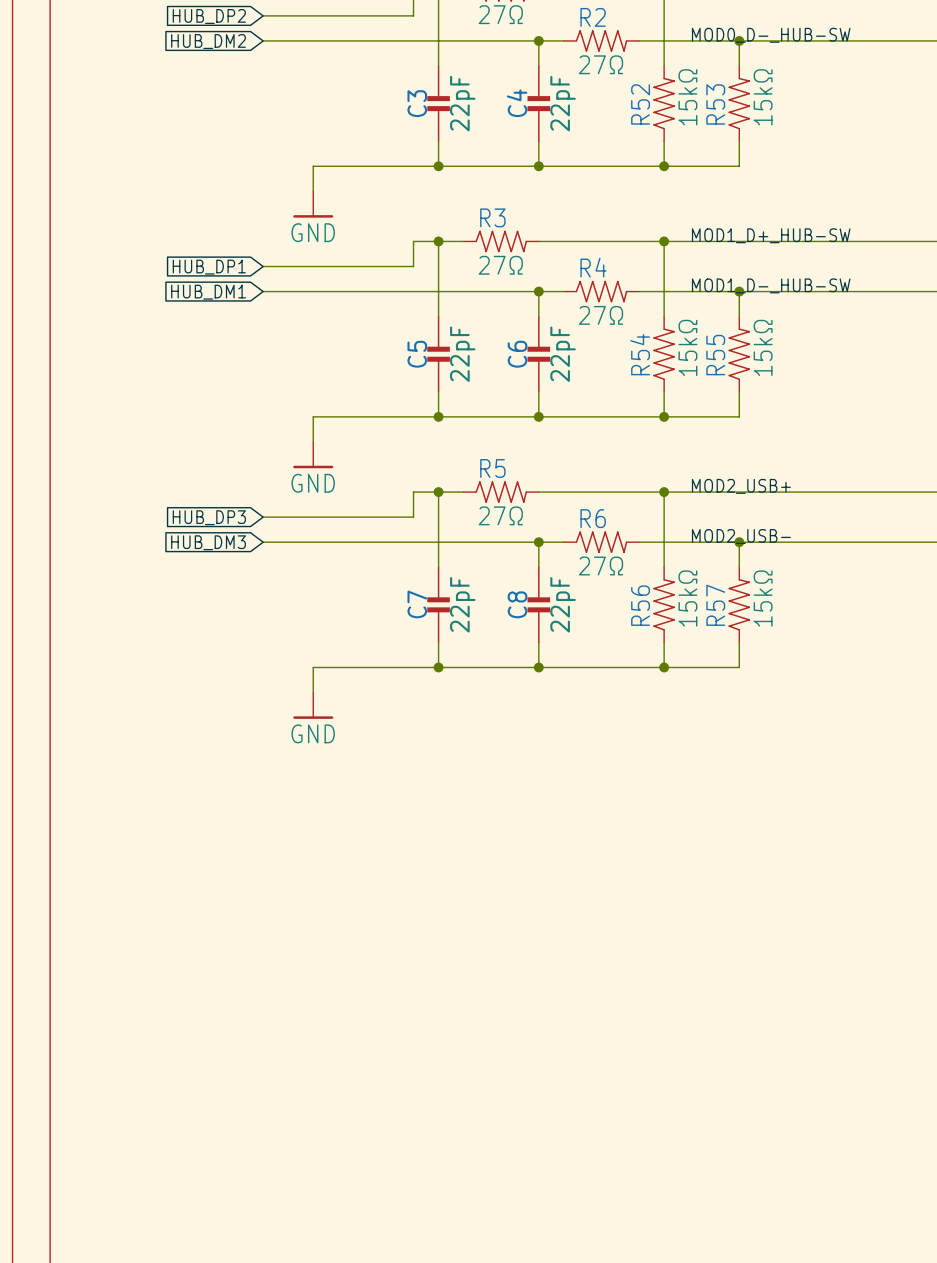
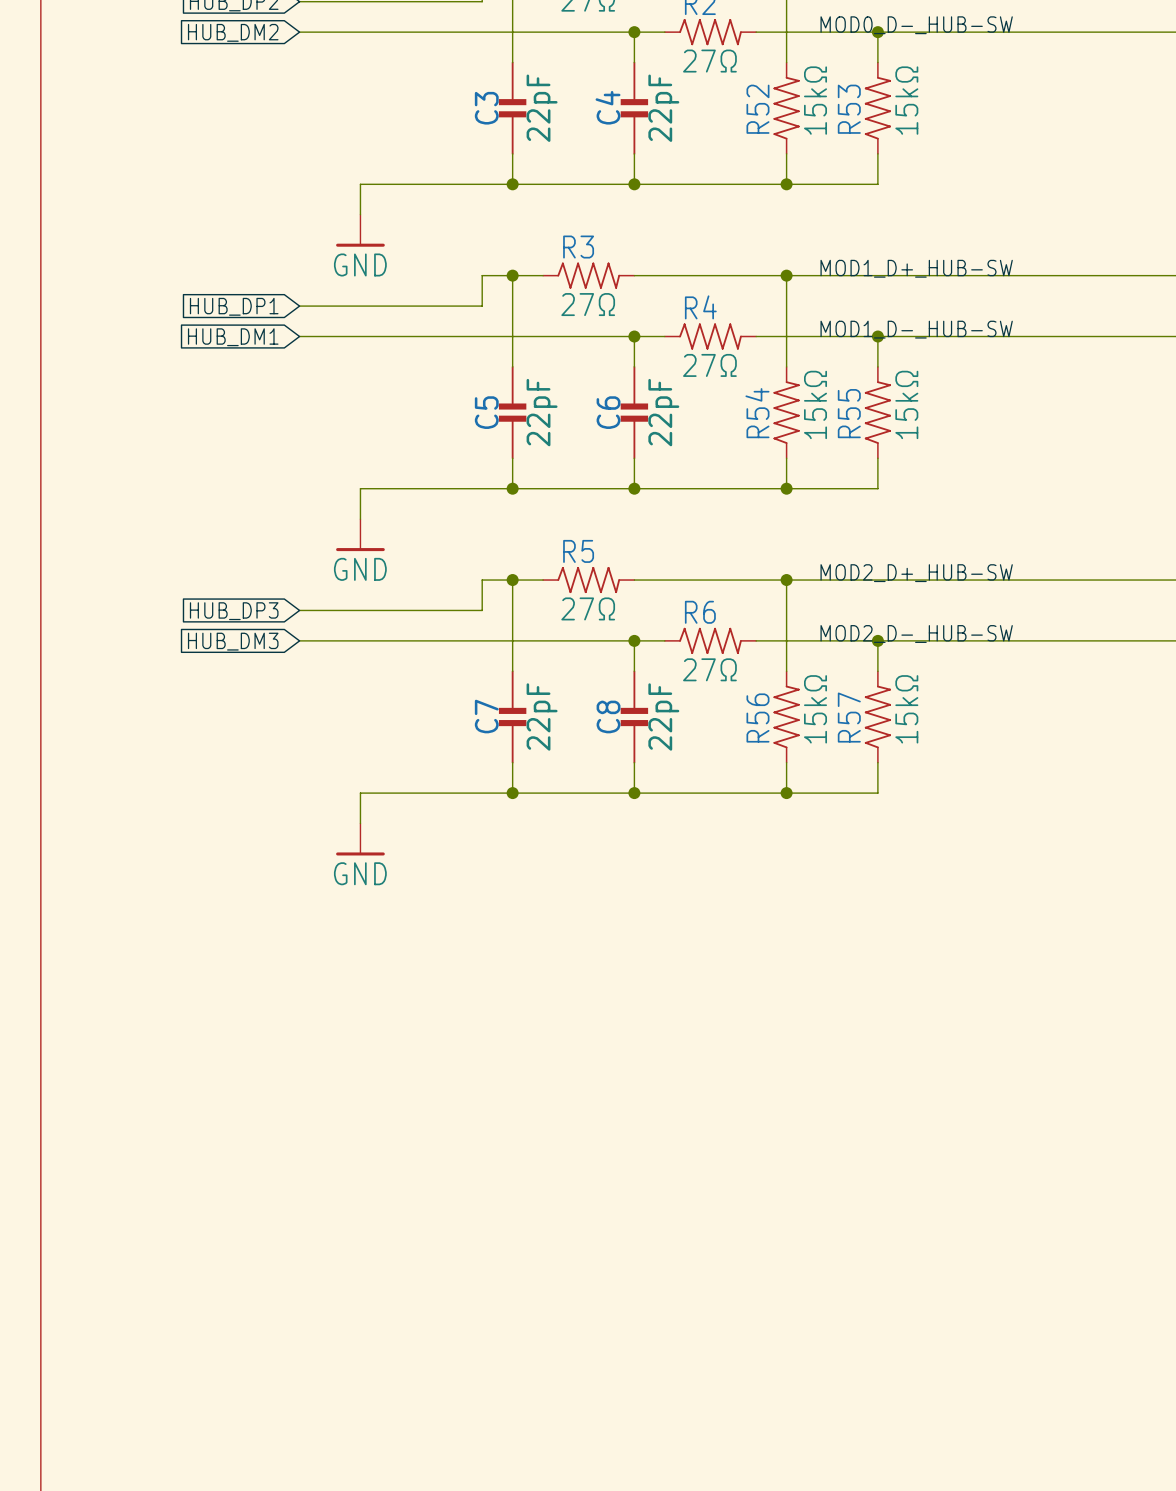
label: MOD2_USB+ (741, 486) -> MOD2_D+_HUB-SW (916, 573)
label: MOD2_USB- (741, 536) -> MOD2_D-_HUB-SW (916, 634)

